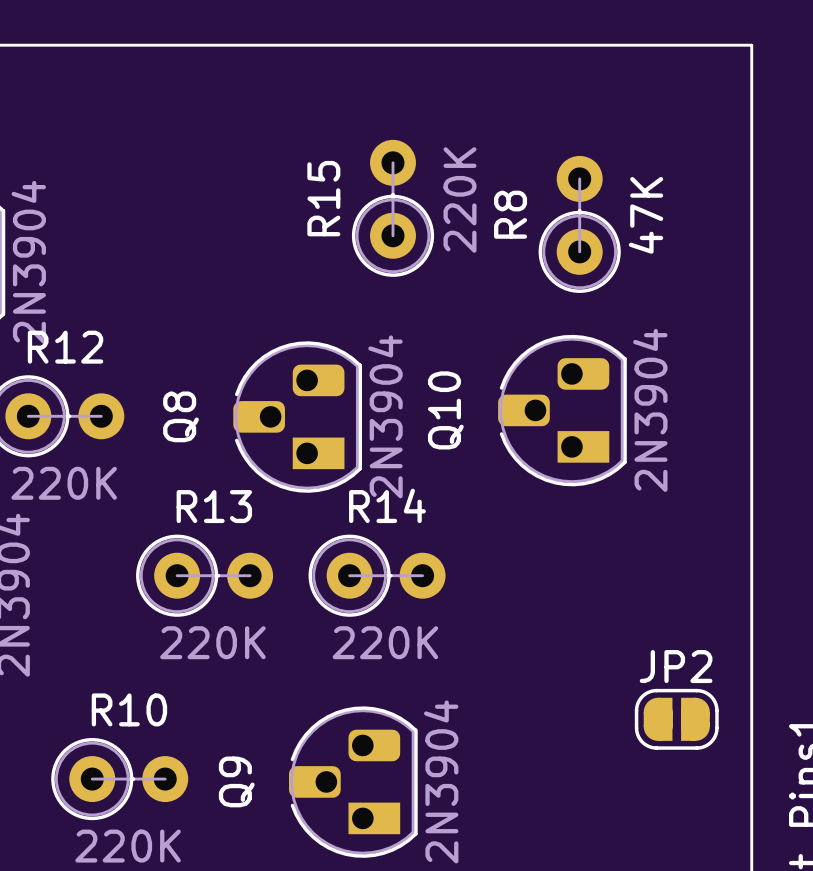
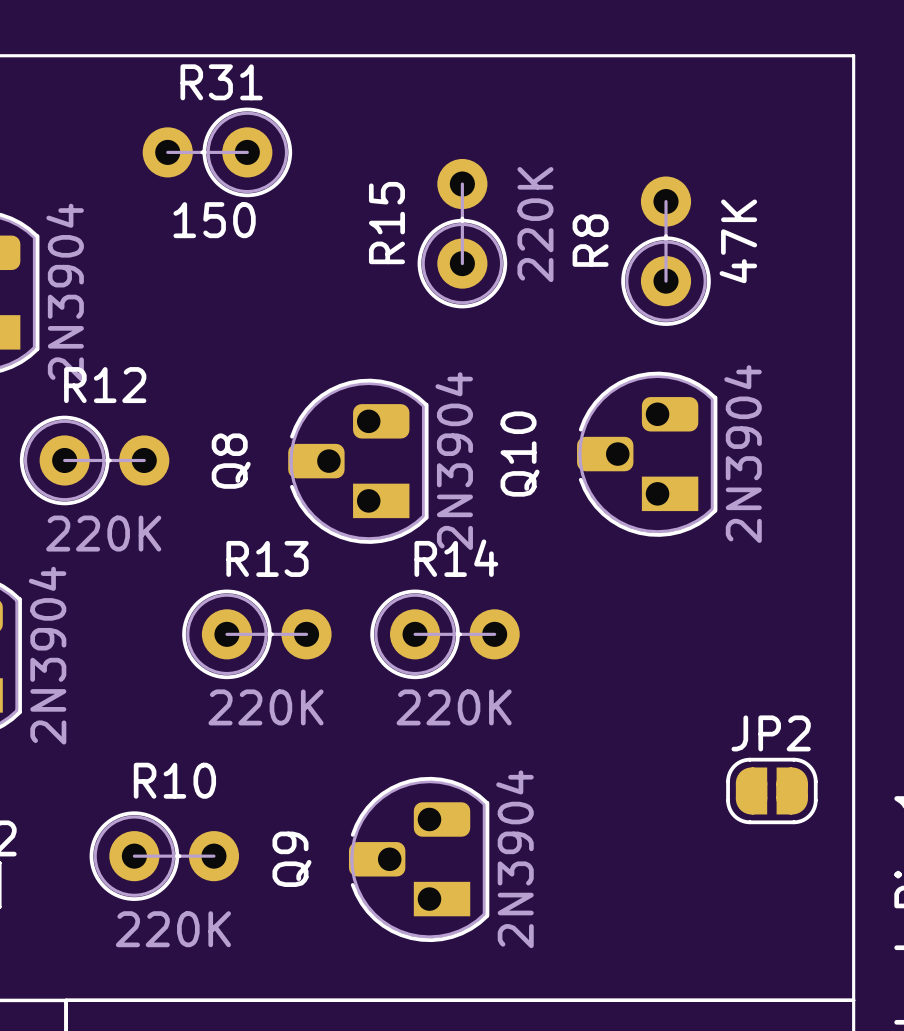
R31: none -> 150 (217, 152)

